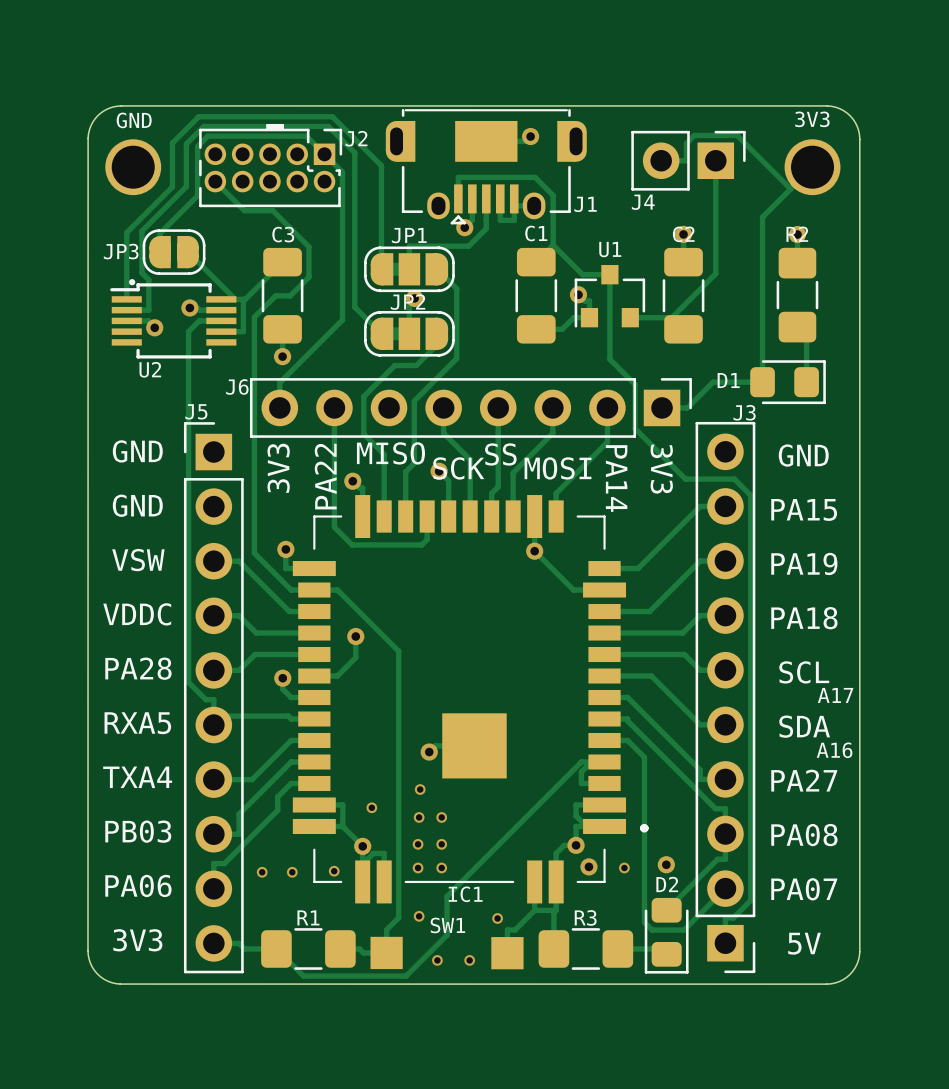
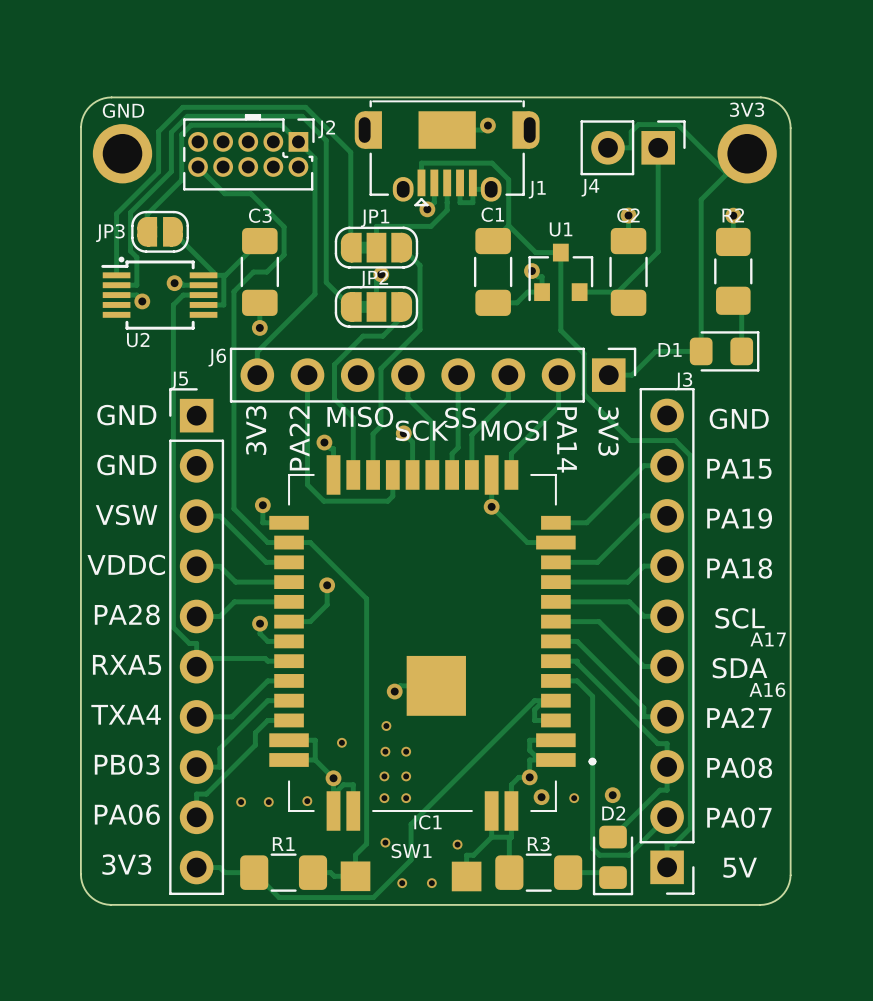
GND footprint: [105, 139, 162, 196] -> [92, 124, 153, 184]
3V3 footprint: [784, 139, 841, 196] -> [717, 124, 777, 184]

